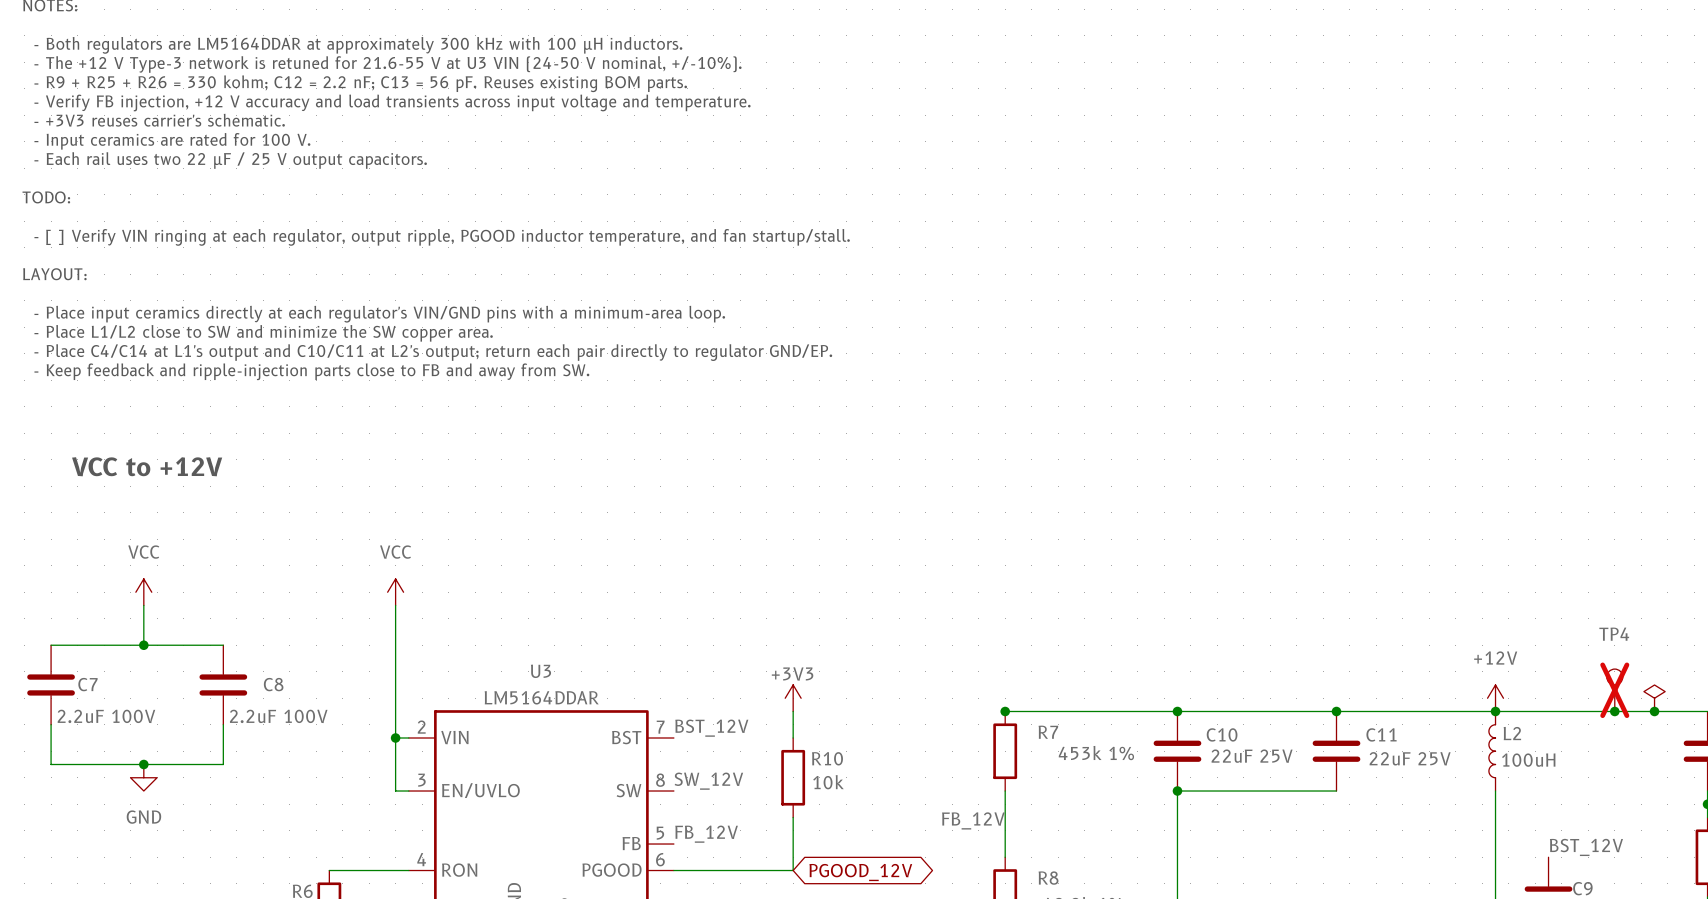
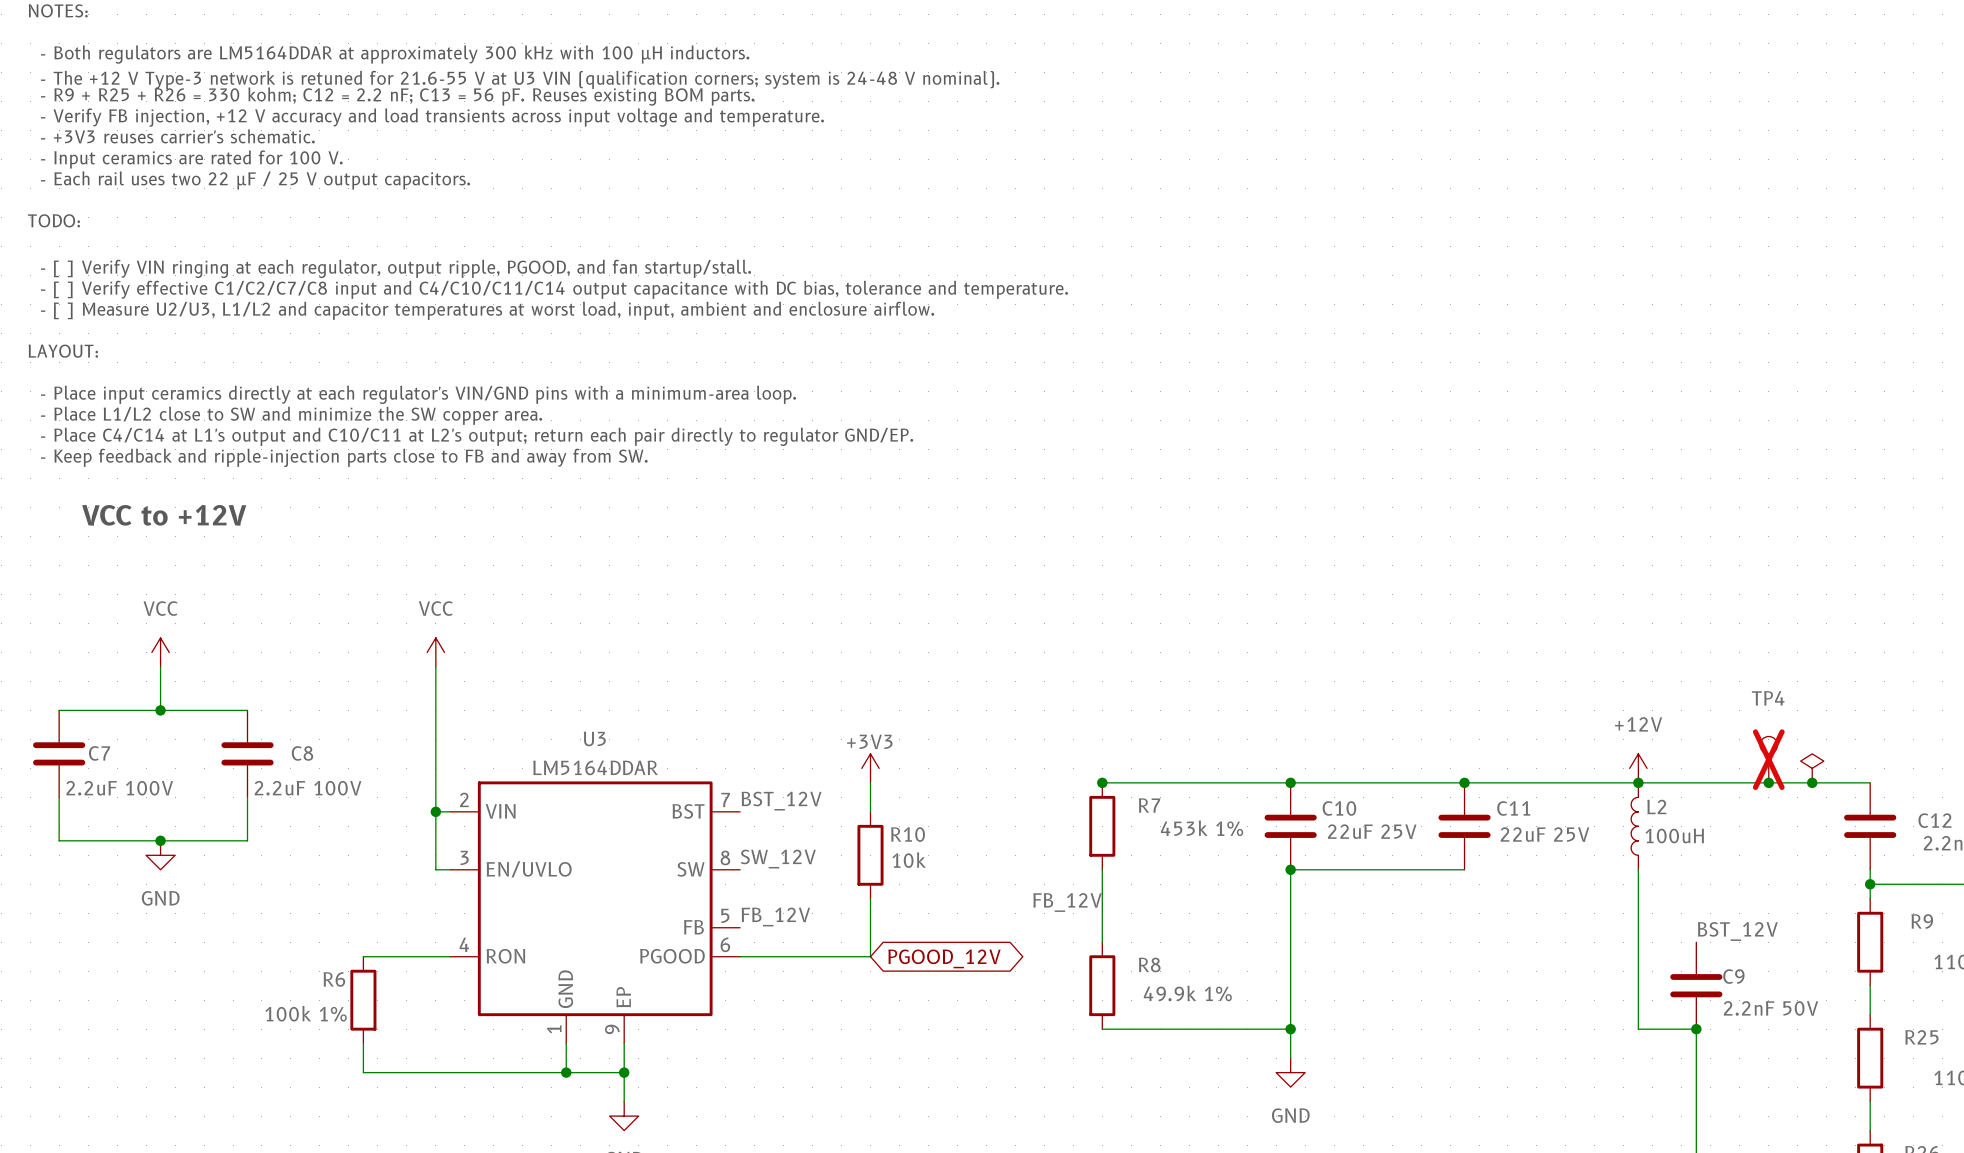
text: - The +12 V Type-3 network is retuned for 21.6-55 V at U3 VIN (24-50 V nominal, +/-10%). (388, 64) -> - The +12 V Type-3 network is retuned for 21.6-55 V at U3 VIN (qualification corners; system is 24-48 V nominal). (520, 79)
text: - [ ] Verify VIN ringing at each regulator, output ripple, PGOOD inductor temperature, and fan startup/stall. (442, 237) -> - [ ] Verify VIN ringing at each regulator, output ripple, PGOOD, and fan startup/stall. (396, 268)
text: none -> - [ ] Verify effective C1/C2/C7/C8 input and C4/C10/C11/C14 output capacitance with DC bias, tolerance and temperature. (554, 289)
text position: LAYOUT: (54, 274) -> LAYOUT: (63, 351)
text: none -> - [ ] Measure U2/U3, L1/L2 and capacitor temperatures at worst load, input, ambient and enclosure airflow. (487, 310)
text position: - Place input ceramics directly at each regulator's VIN/GND pins with a minimum-area loop. (379, 314) -> - Place input ceramics directly at each regulator's VIN/GND pins with a minimum-area loop. (418, 394)
text position: - Place L1/L2 close to SW and minimize the SW copper area. (263, 333) -> - Place L1/L2 close to SW and minimize the SW copper area. (291, 415)
text position: - Place C4/C14 at L1's output and C10/C11 at L2's output; return each pair directly to regulator GND/EP. (433, 352) -> - Place C4/C14 at L1's output and C10/C11 at L2's output; return each pair directly to regulator GND/EP. (477, 436)
text position: - Keep feedback and ripple-injection parts close to FB and away from SW. (311, 371) -> - Keep feedback and ripple-injection parts close to FB and away from SW. (344, 457)

